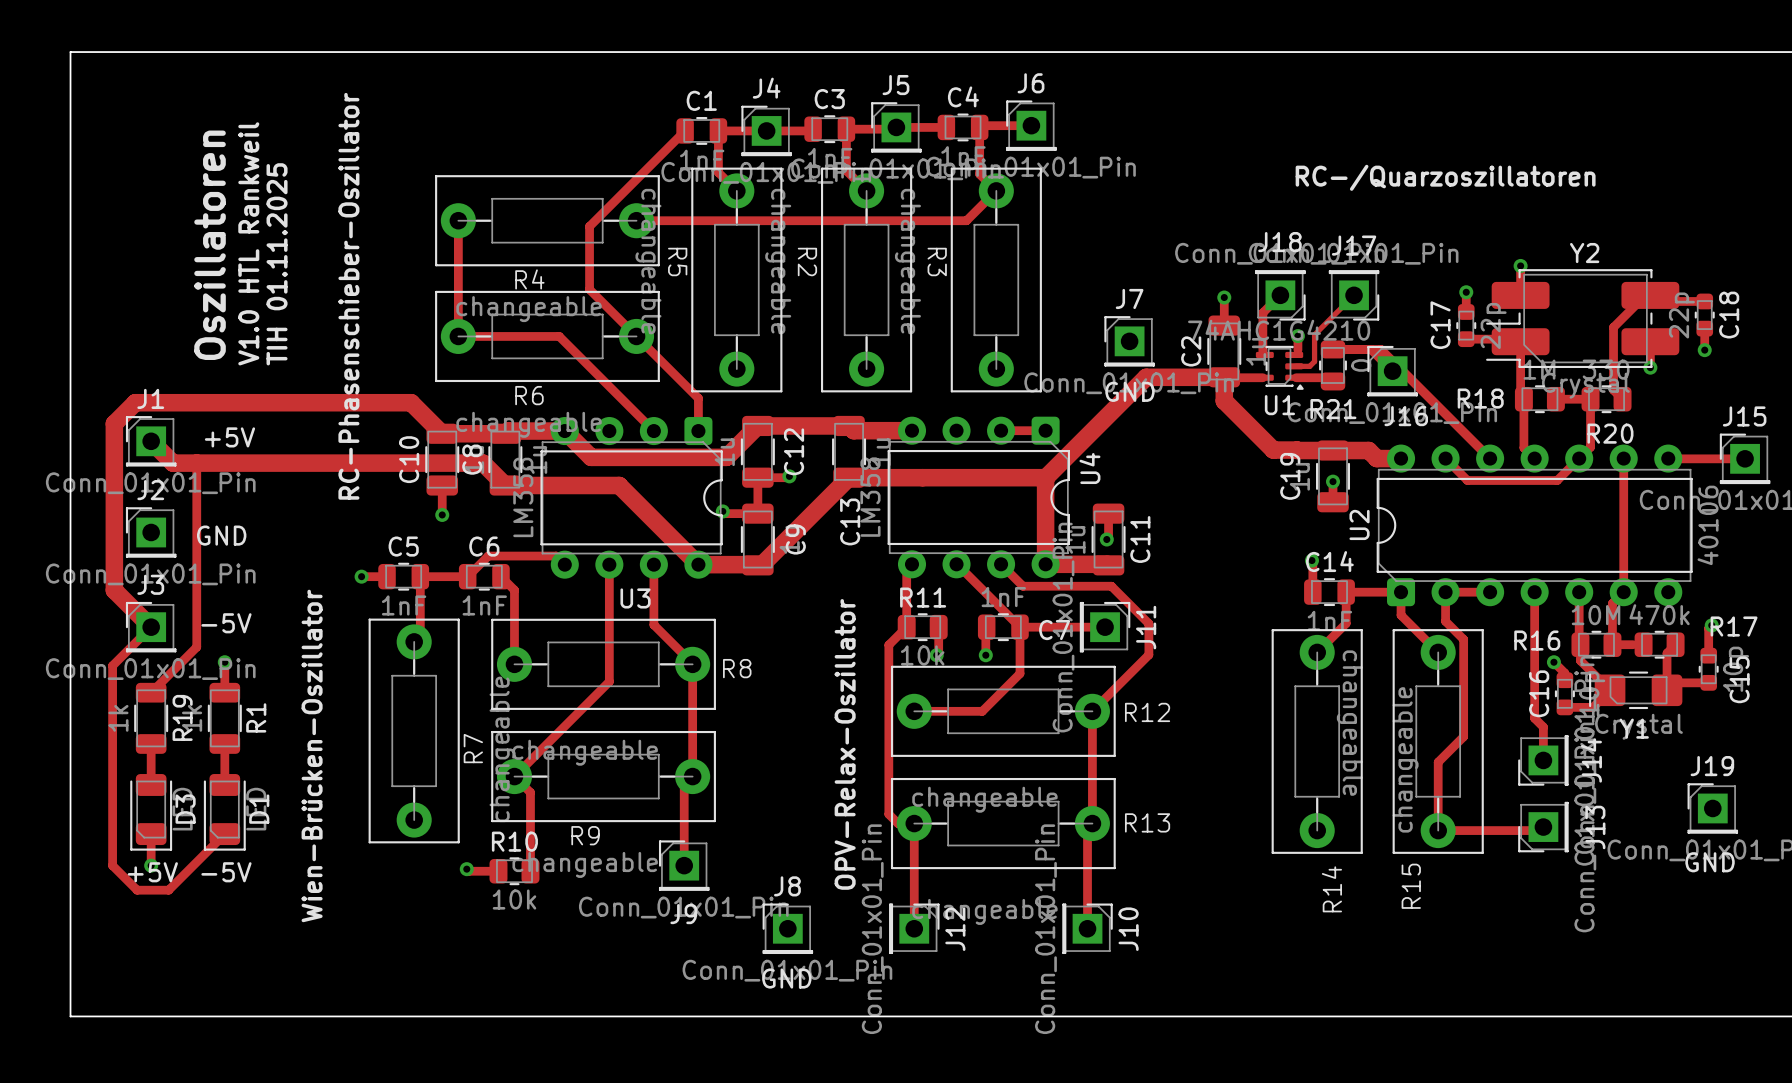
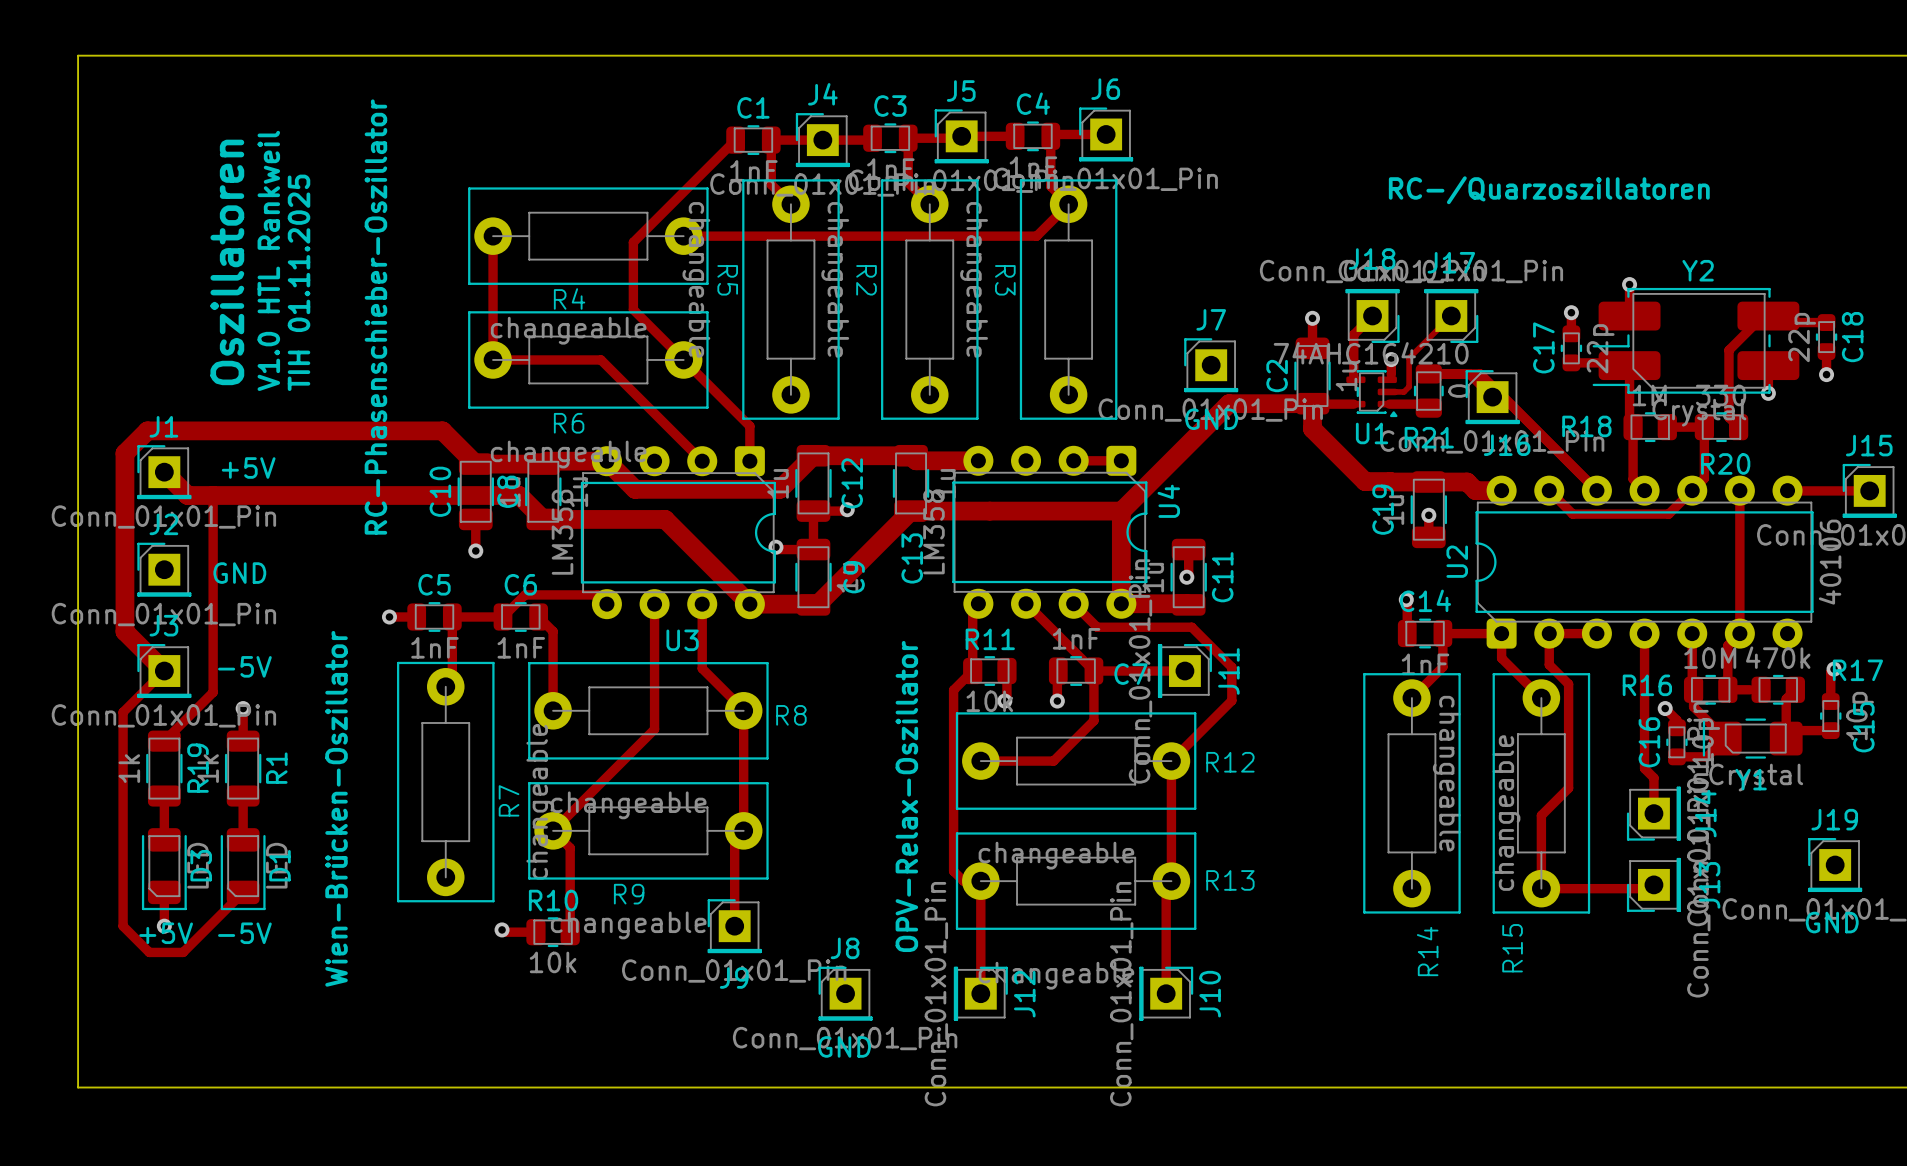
R5 footprint: [691, 167, 783, 393] -> [742, 179, 840, 420]
R2 footprint: [820, 167, 913, 393] -> [881, 179, 979, 420]
R3 footprint: [950, 167, 1042, 393] -> [1019, 179, 1118, 420]
R4 footprint: [435, 175, 660, 267] -> [468, 187, 709, 285]
R6 footprint: [435, 290, 660, 383] -> [468, 311, 709, 409]
R7 footprint: [368, 618, 460, 844] -> [396, 661, 495, 903]
R8 footprint: [491, 618, 716, 710] -> [528, 662, 769, 760]
R15 footprint: [1271, 629, 1363, 854] -> [1363, 673, 1461, 914]
R14 footprint: [1392, 629, 1484, 854] -> [1492, 673, 1591, 914]
R12 footprint: [890, 665, 1116, 757] -> [955, 712, 1197, 810]
R9 footprint: [491, 730, 716, 823] -> [528, 782, 769, 880]
R13 footprint: [890, 777, 1116, 870] -> [955, 832, 1197, 930]

